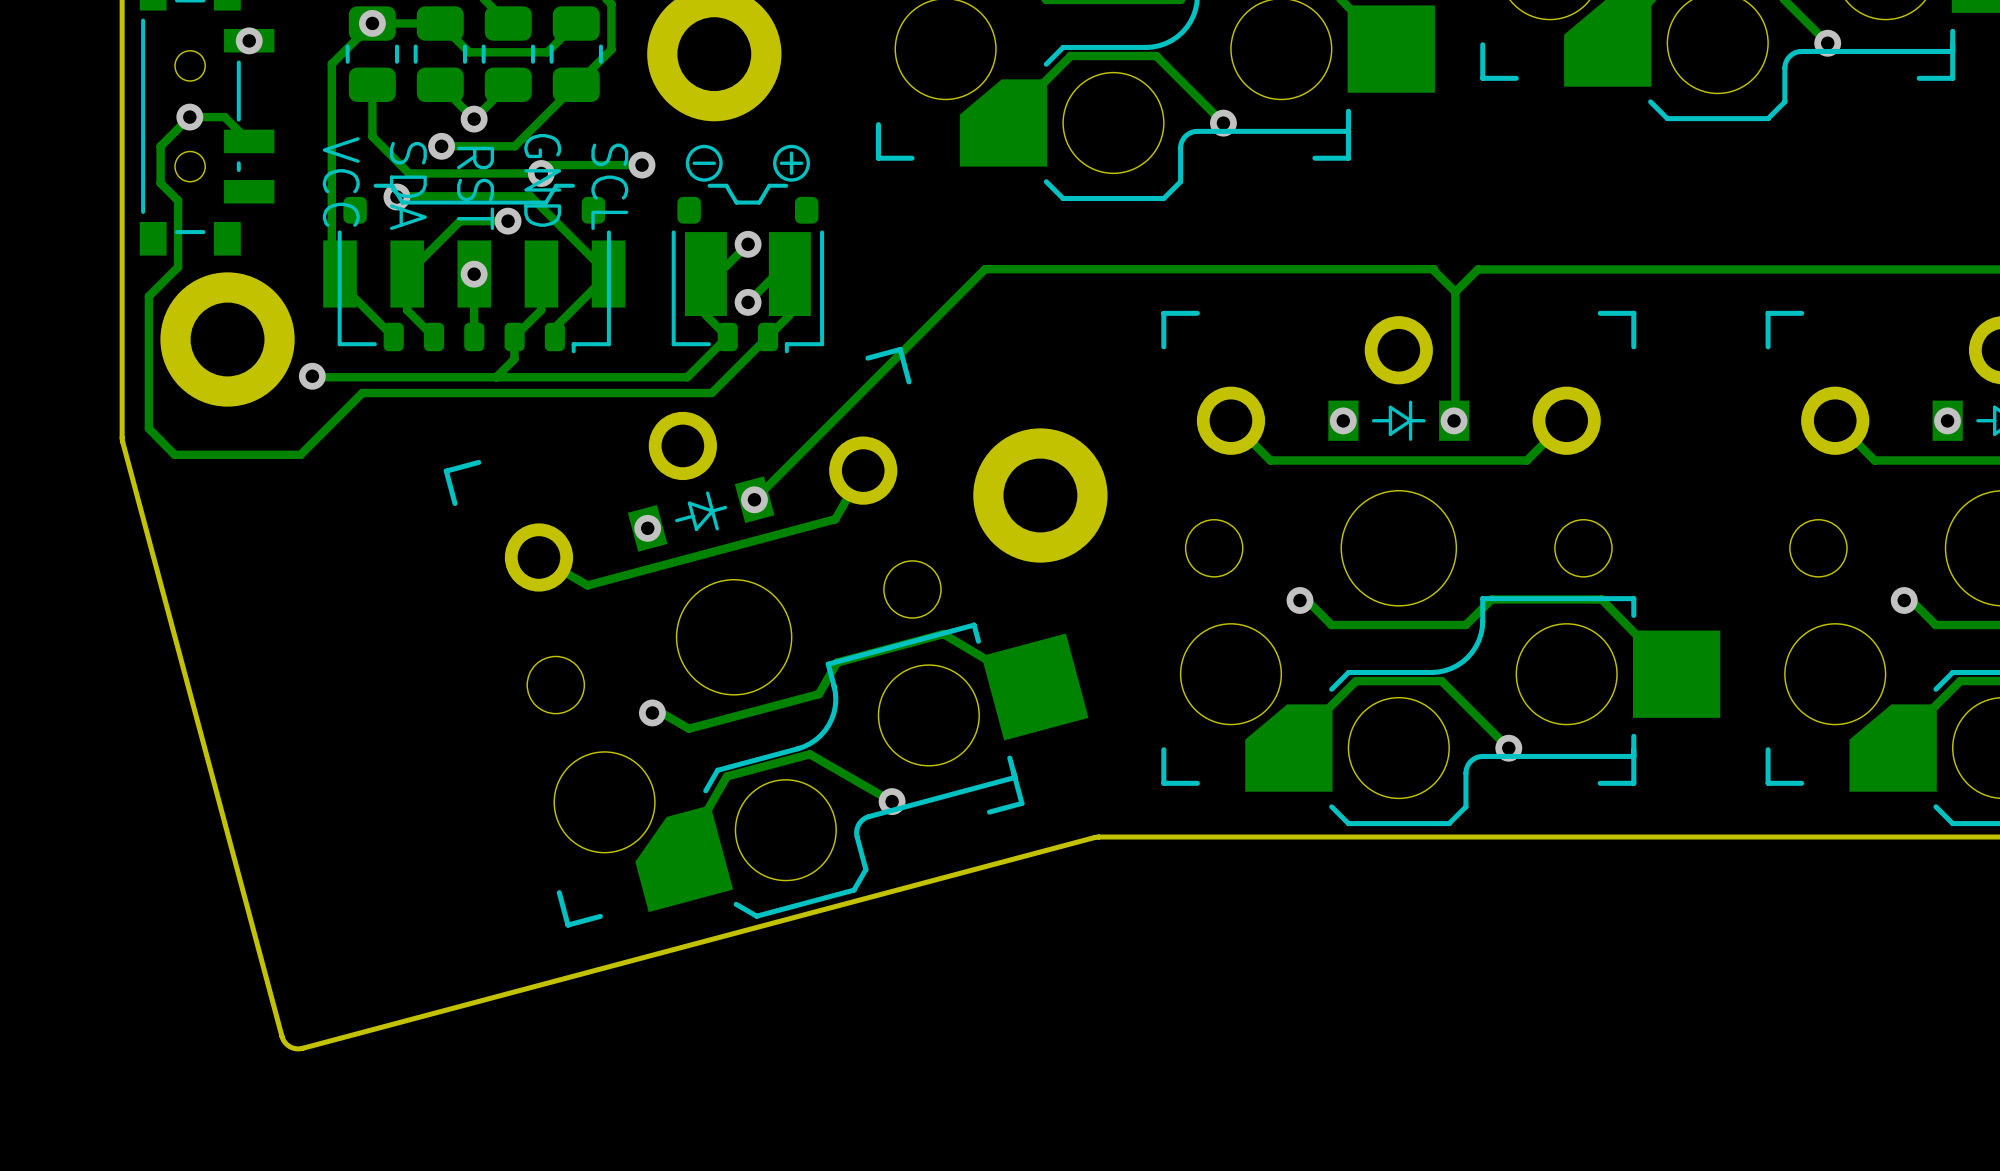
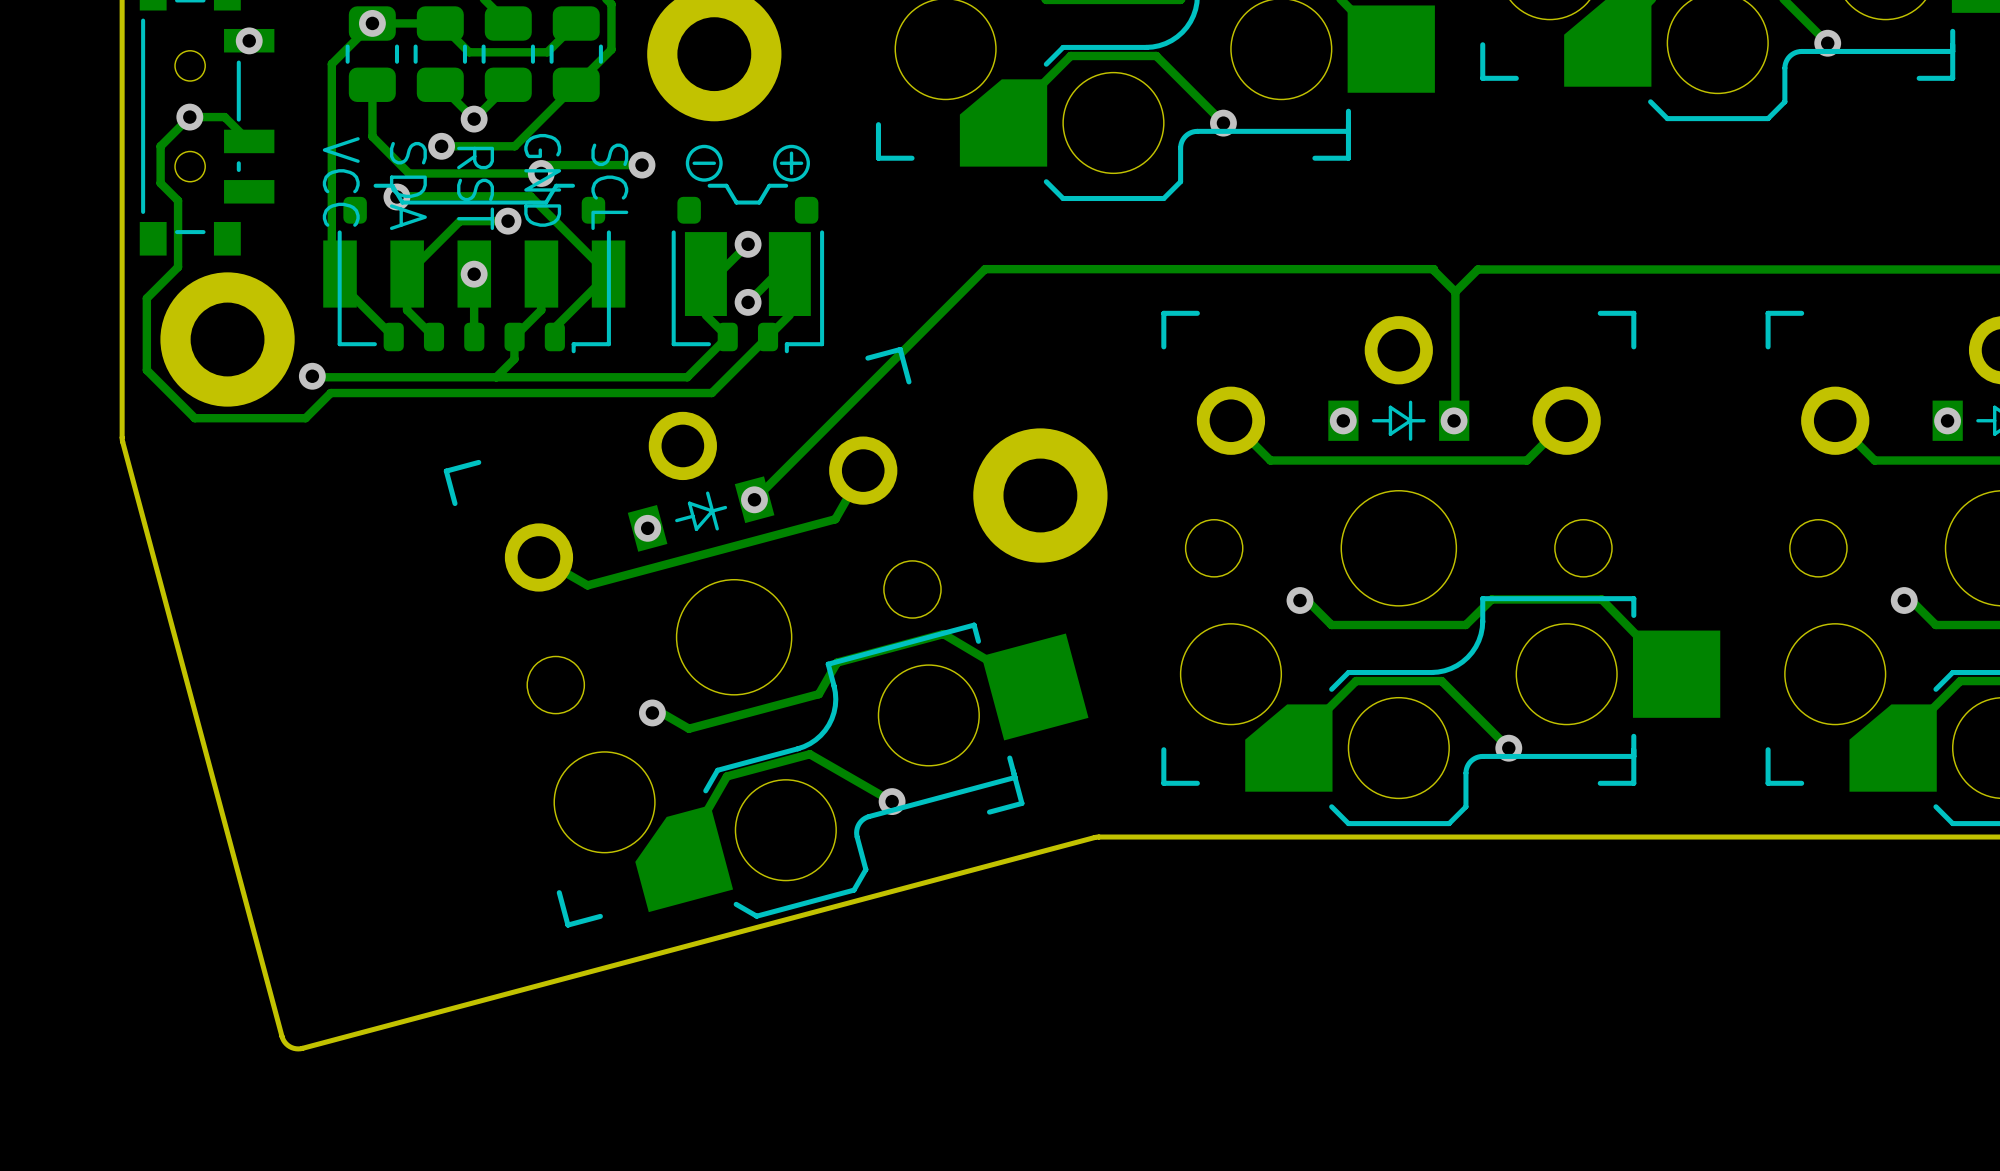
track: (148, 296) (148, 428) (174, 454) (300, 454) (362, 393) -> (148, 296) (146, 298) (146, 370) (194, 418) (305, 418) (330, 393) (362, 393)

